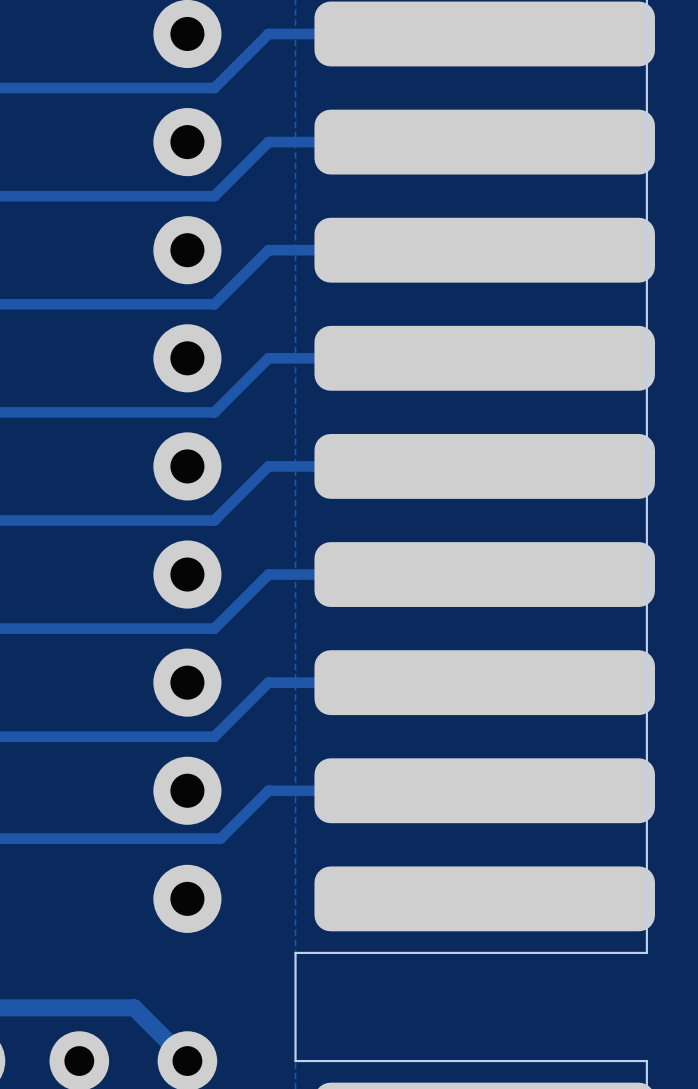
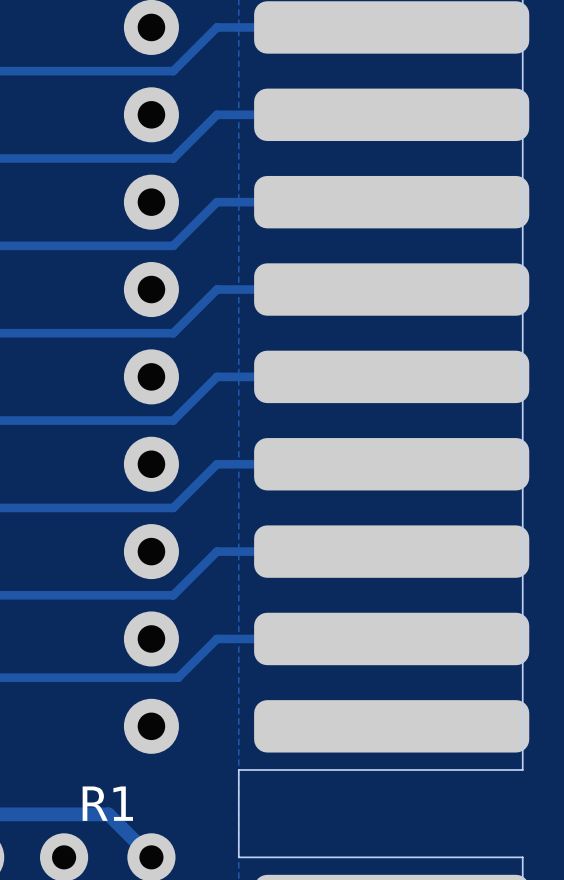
R1 name: none -> R1 (107, 803)

